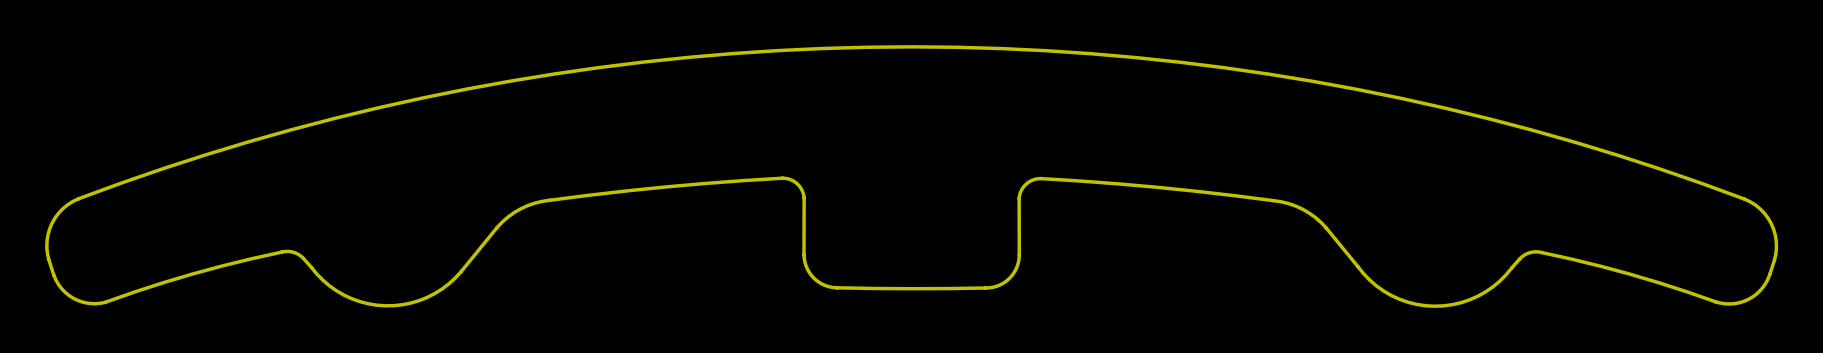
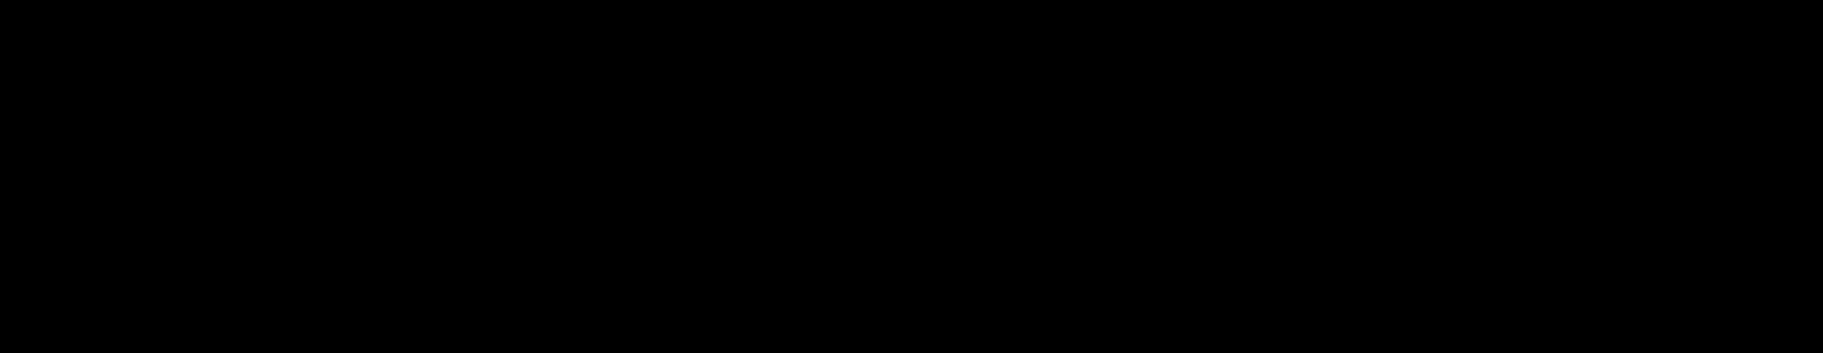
board edge: (782, 178) (665, 186) (534, 203) (514, 212) (502, 221) (461, 271) (442, 288) (419, 300) (394, 305) (368, 303) (344, 295) (323, 280) (299, 255) (286, 251) (192, 274) (105, 302) (89, 303) (74, 298) (61, 288) (53, 275) (47, 253) (47, 234) (55, 217) (67, 204) (78, 198) (163, 168) (248, 141) (378, 107) (510, 81) (643, 62) (777, 50) (911, 46) (1046, 50) (1180, 62) (1313, 81) (1445, 108) (1531, 130) (1617, 155) (1744, 199) (1755, 205) (1768, 218) (1773, 229) (1776, 247) (1769, 274) (1763, 287) (1752, 297) (1734, 303) (1720, 303) (1629, 274) (1536, 251) (1523, 255) (1499, 281) (1477, 296) (1452, 304) (1425, 305) (1399, 299) (1376, 285) (1363, 273) (1320, 222) (1302, 209) (1288, 203) (1157, 187) (1040, 178) (1028, 182) (1020, 193) (1018, 262) (1011, 275) (1003, 283) (985, 288) (837, 287) (820, 283) (813, 278) (806, 267) (804, 254) (803, 195) (795, 182) (782, 178) -> none

